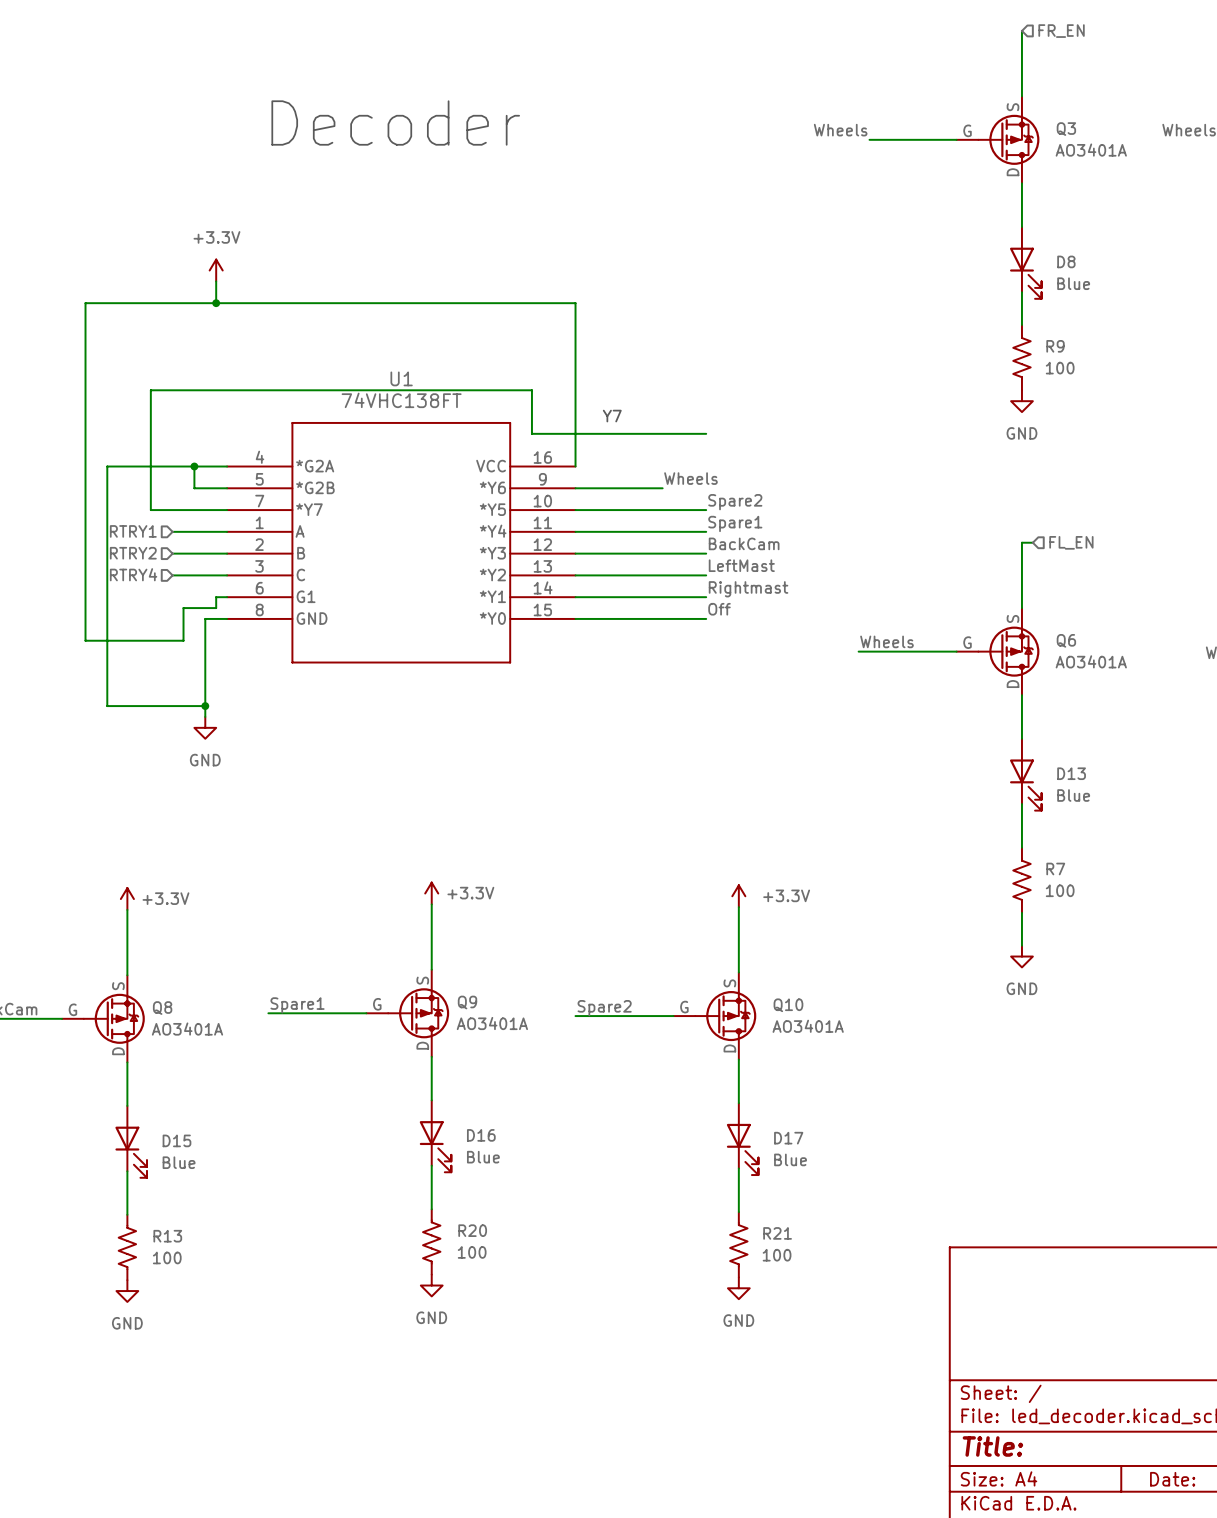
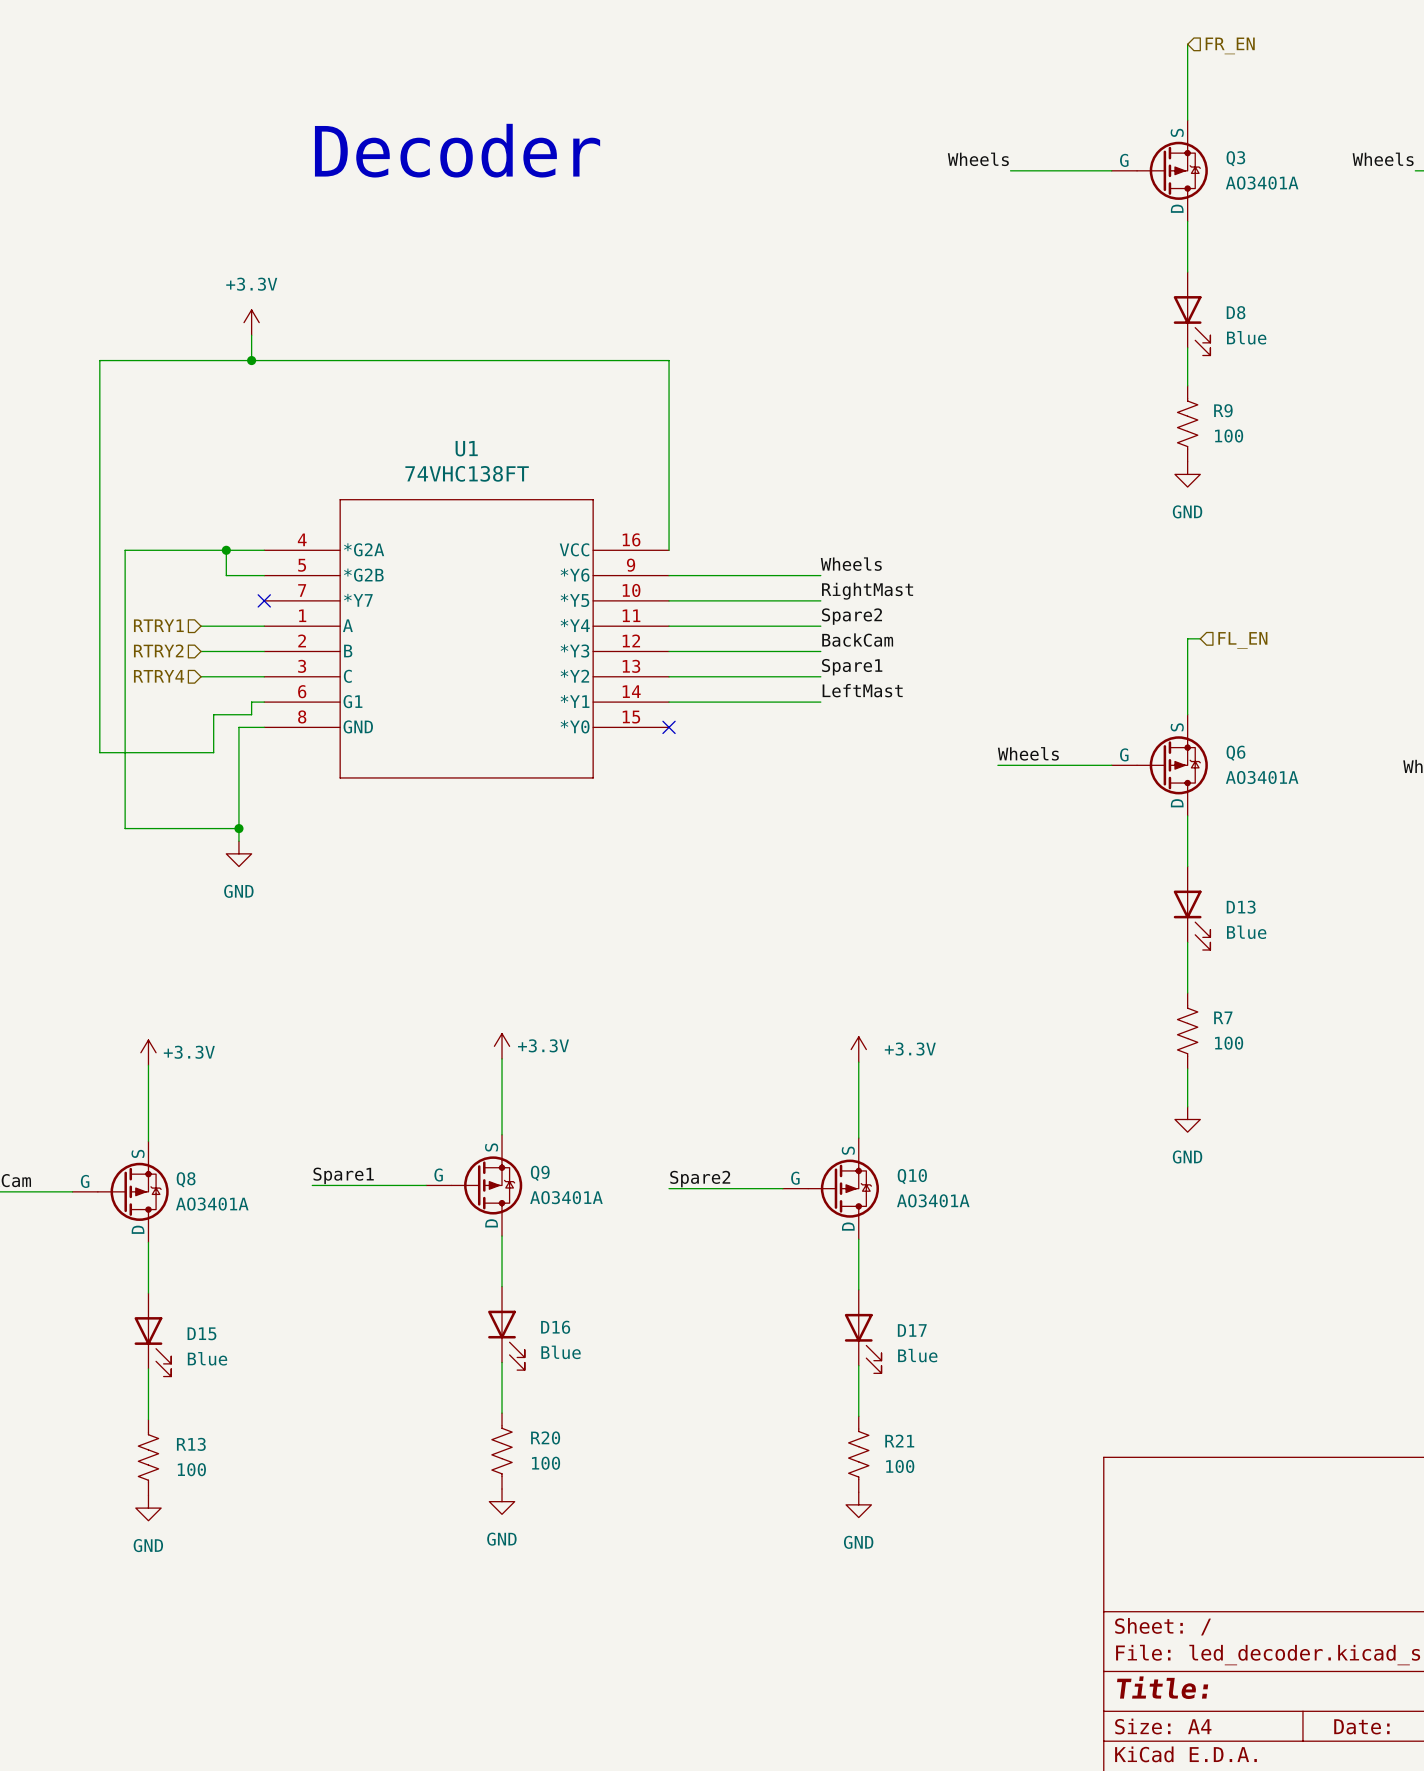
text: Y7 (612, 416) -> none
wire: (706, 433) (531, 433) (531, 390) (150, 390) (150, 510) (227, 510) -> none
label position: Wheels (690, 478) -> Wheels (851, 564)
wire: none -> (770, 575) (820, 575)
label: Spare2 (735, 502) -> RightMast (867, 591)
no-connect mark: none -> (264, 600)
label: Spare1 (735, 523) -> Spare2 (852, 616)
label: LeftMast (741, 565) -> Spare1 (852, 667)
label: Rightmast (748, 589) -> LeftMast (862, 690)
label: Off (719, 609) -> none
wire: (575, 618) (706, 618) -> none
no-connect mark: none -> (669, 727)

